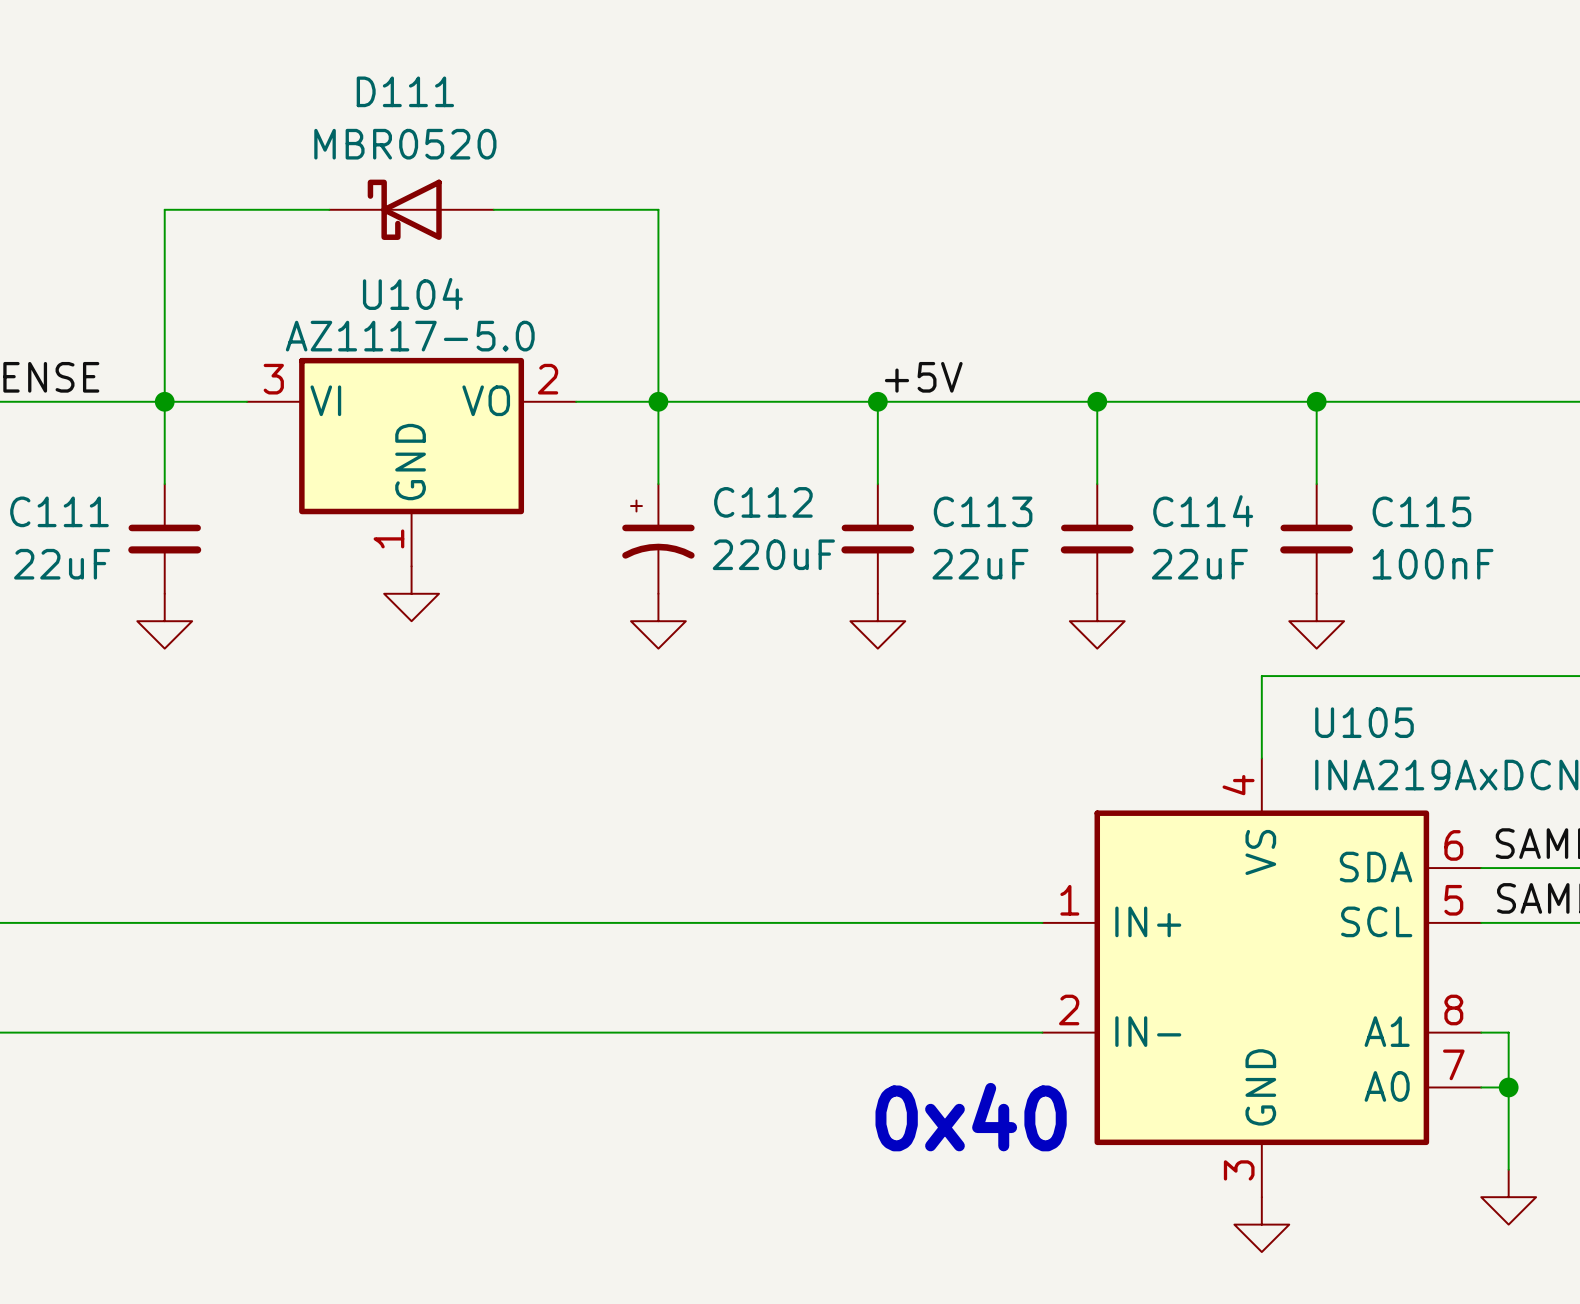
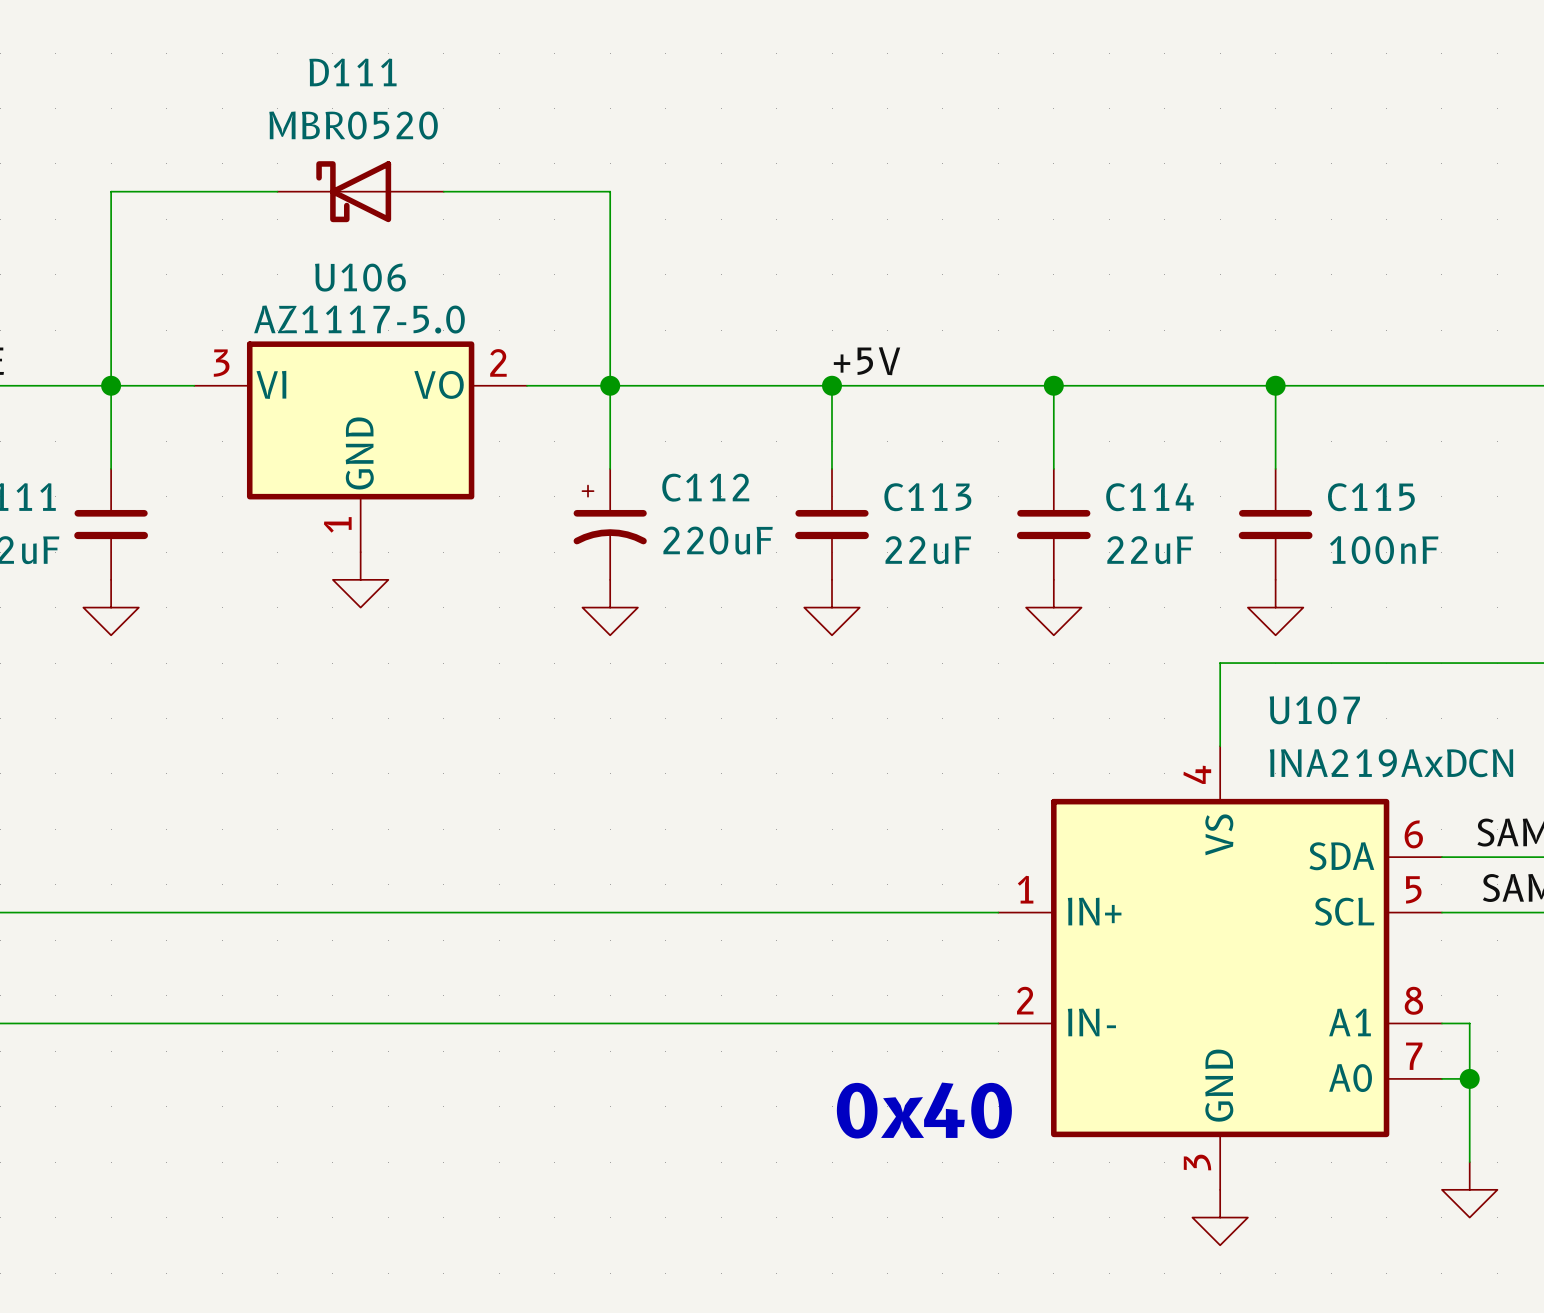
U104 name: U104 (412, 293) -> U106 (360, 277)
U105 name: U105 (1364, 722) -> U107 (1314, 710)

